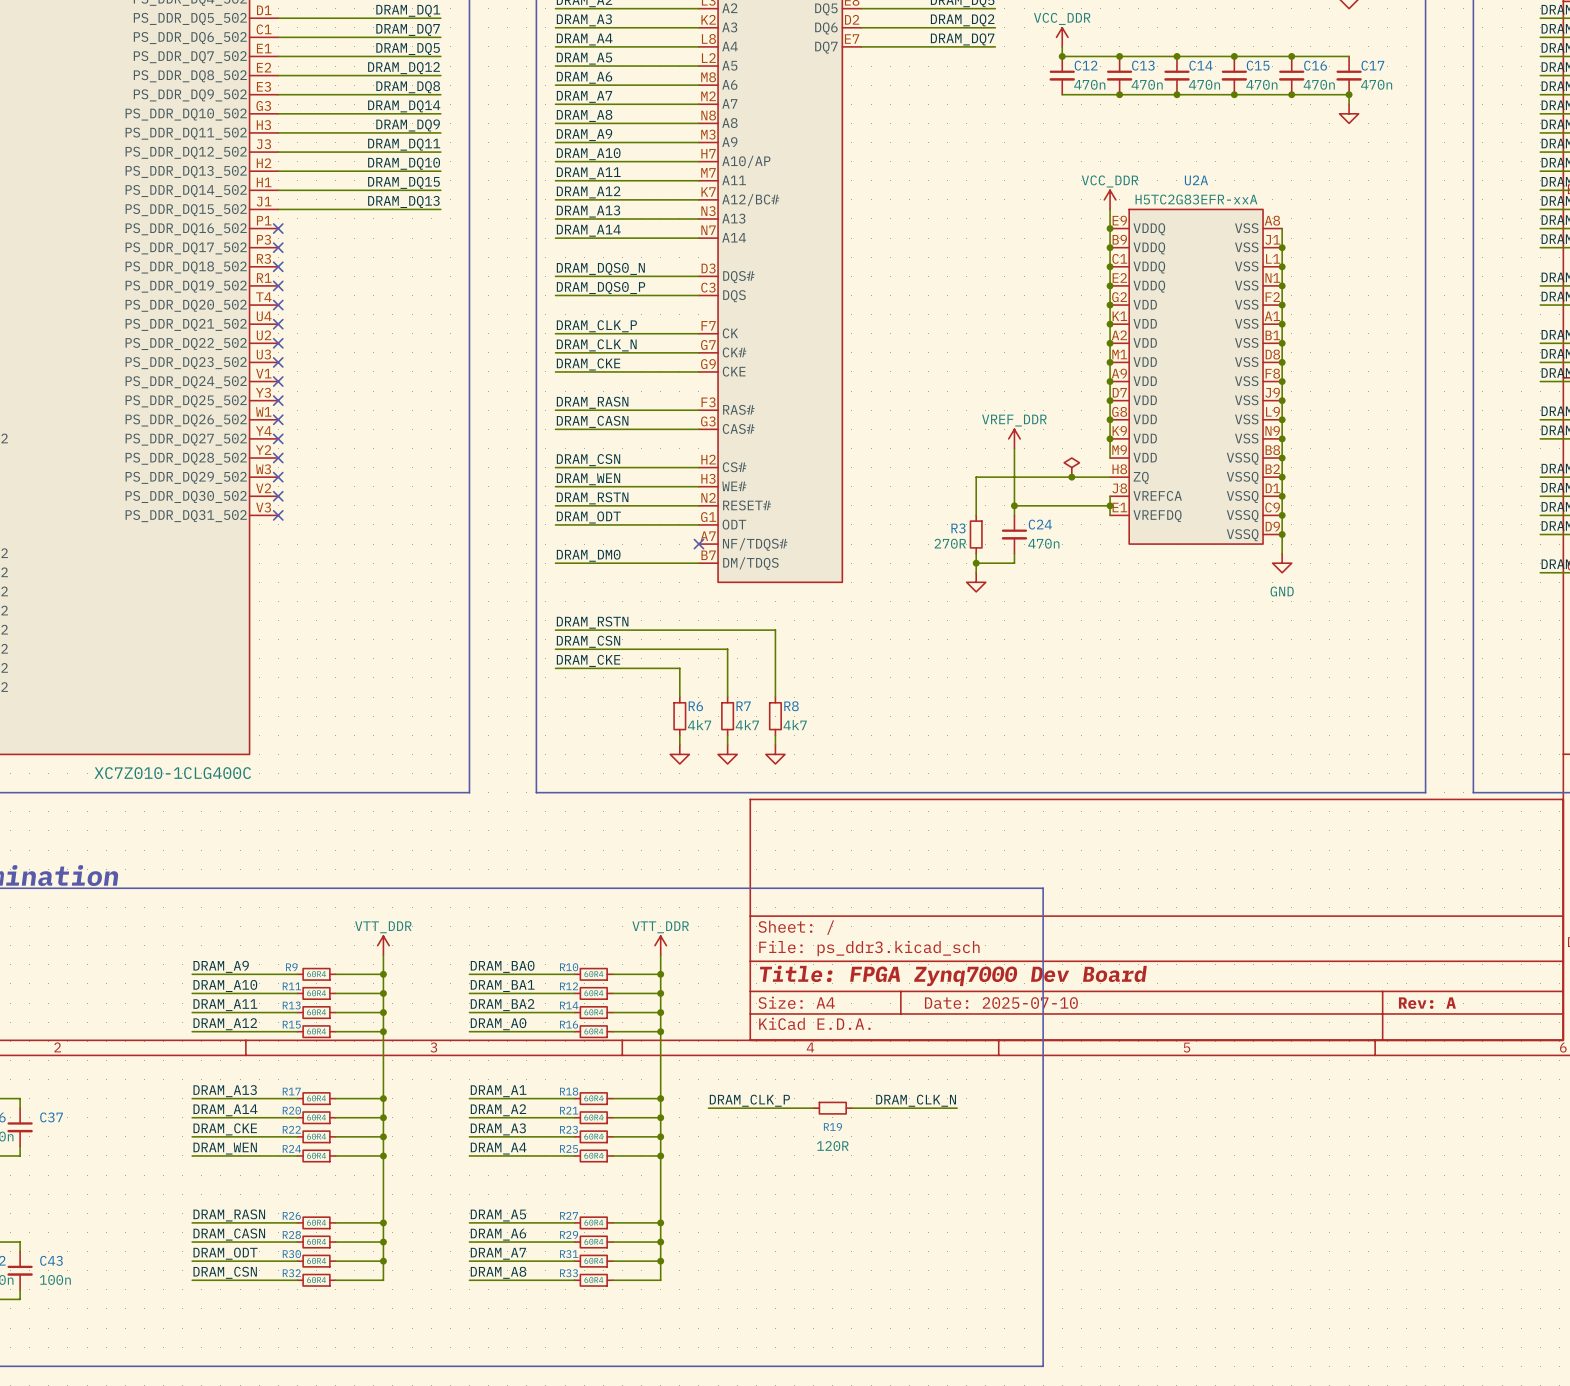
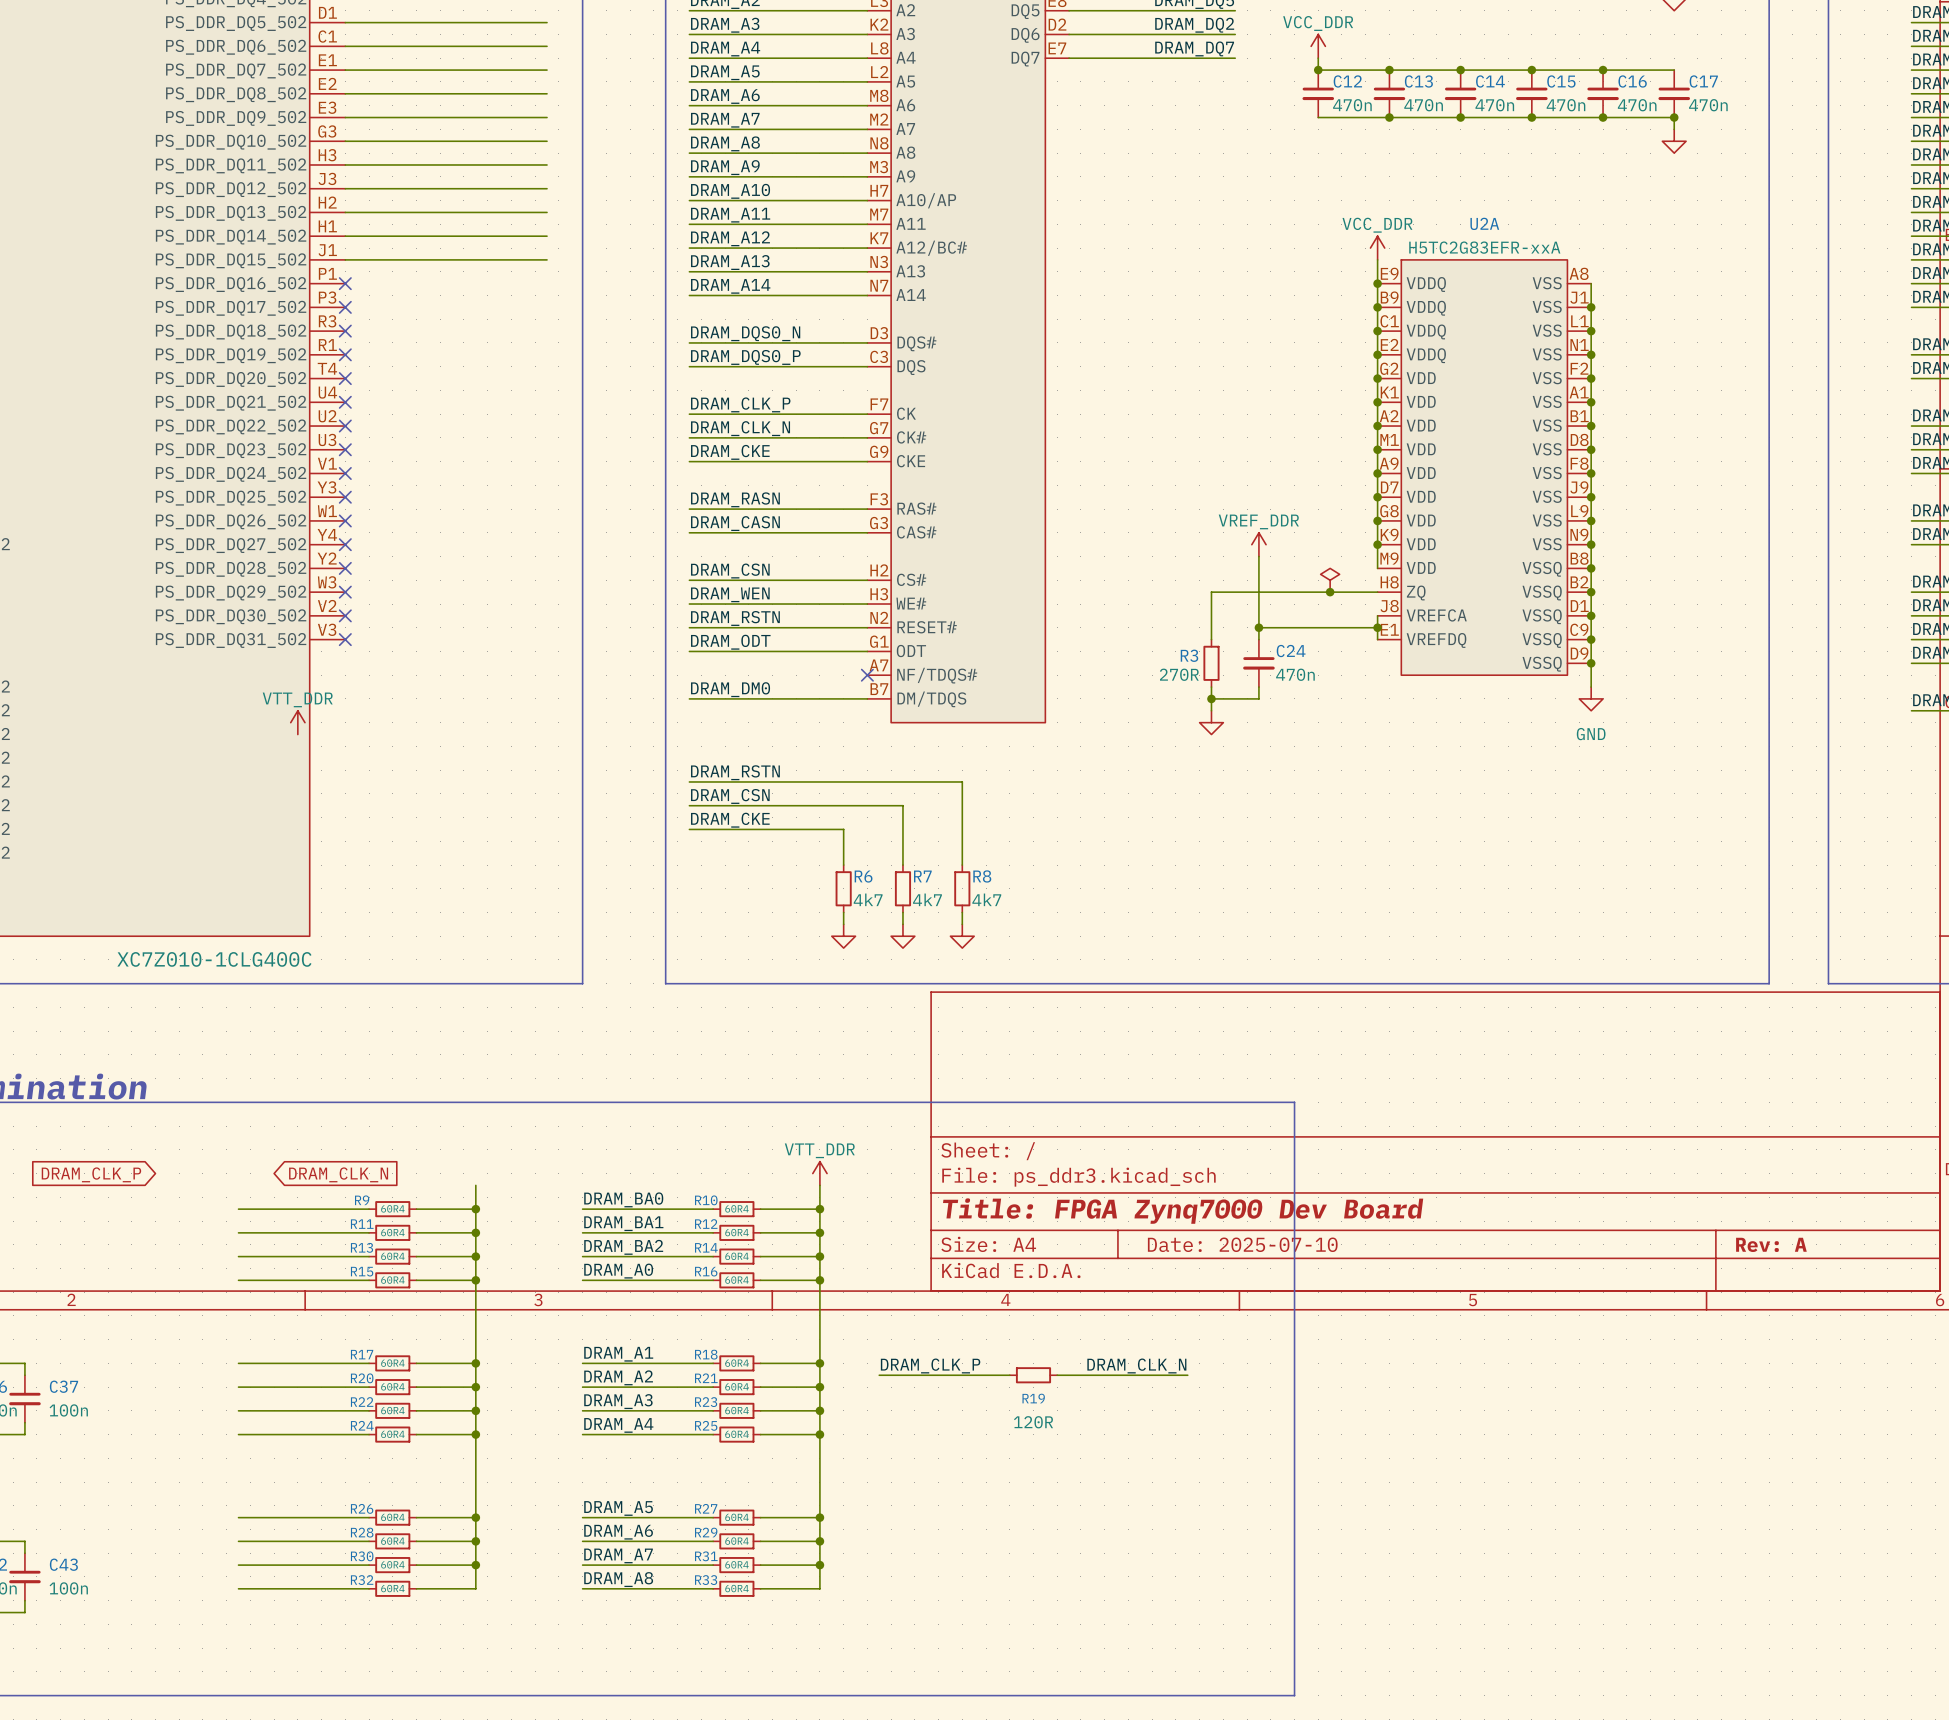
label: DRAM_DQ1 (408, 10) -> none
label: DRAM_DQ7 (408, 29) -> none
label: DRAM_DQ5 (408, 49) -> none
label: DRAM_DQ12 (404, 68) -> none
label: DRAM_DQ8 (408, 87) -> none
label: DRAM_DQ14 (404, 106) -> none
label: DRAM_DQ9 (408, 125) -> none
label: DRAM_DQ11 (404, 144) -> none
label: DRAM_DQ10 (404, 163) -> none
label: DRAM_DQ15 (403, 182) -> none
label: DRAM_DQ13 (403, 201) -> none
power symbol: none -> VTT_DDR (297, 722)
power symbol: VTT_DDR (383, 945) -> none
global label: none -> DRAM_CLK_P (91, 1174)
global label: none -> DRAM_CLK_N (338, 1174)
label: DRAM_A9 (221, 966) -> none
label: DRAM_A10 (225, 985) -> none
label: DRAM_A11 (225, 1005) -> none
label: DRAM_A12 (225, 1024) -> none
label: DRAM_A13 (225, 1091) -> none
label: DRAM_A14 (225, 1110) -> none
label: DRAM_CKE (225, 1129) -> none
C37 value: none -> 100n (68, 1410)
label: DRAM_WEN (225, 1148) -> none
label: DRAM_RASN (229, 1215) -> none
label: DRAM_CASN (229, 1234) -> none
label: DRAM_ODT (225, 1253) -> none
label: DRAM_CSN (225, 1272) -> none

